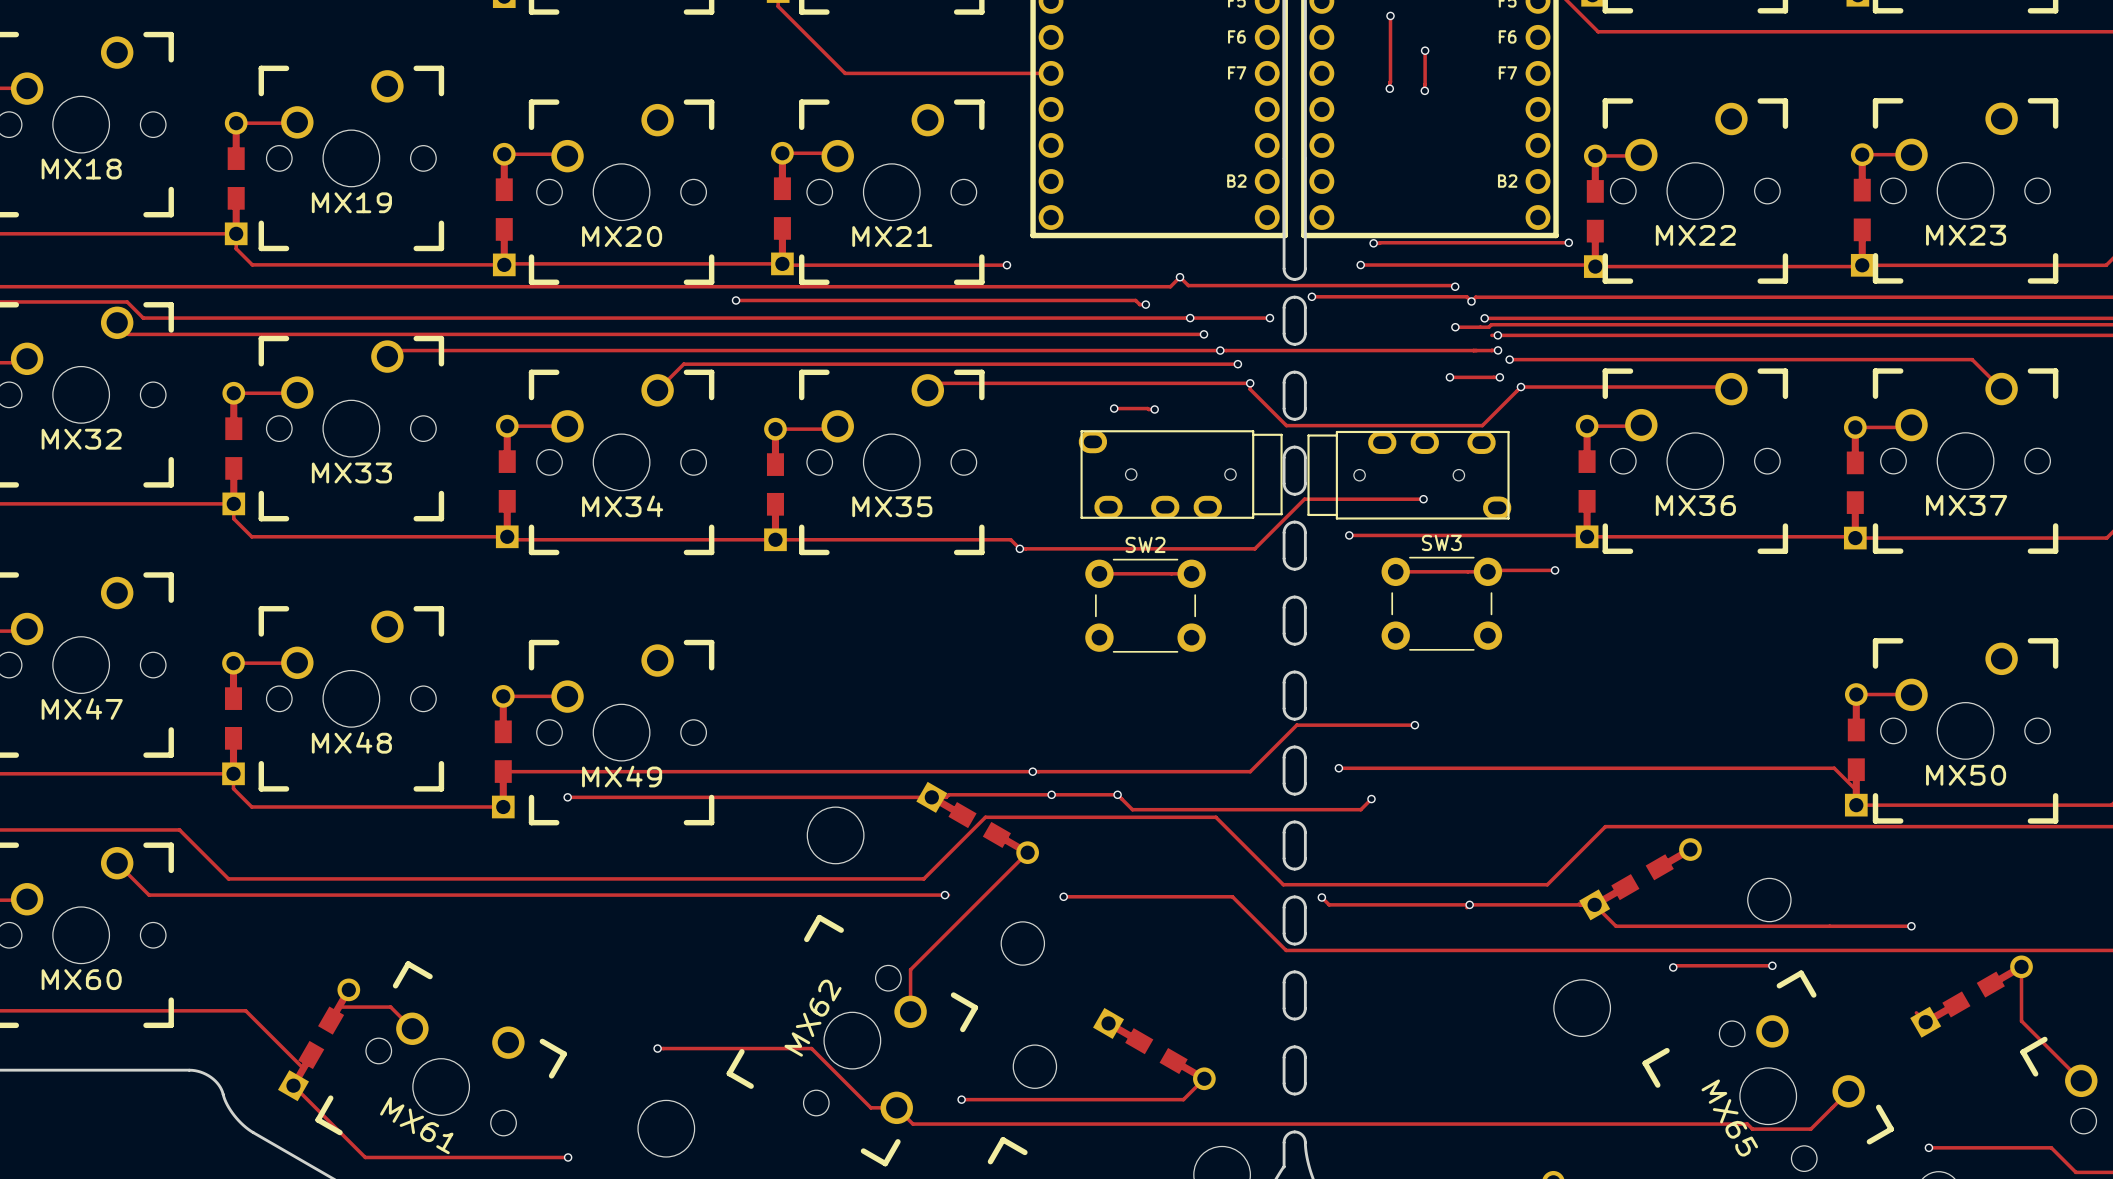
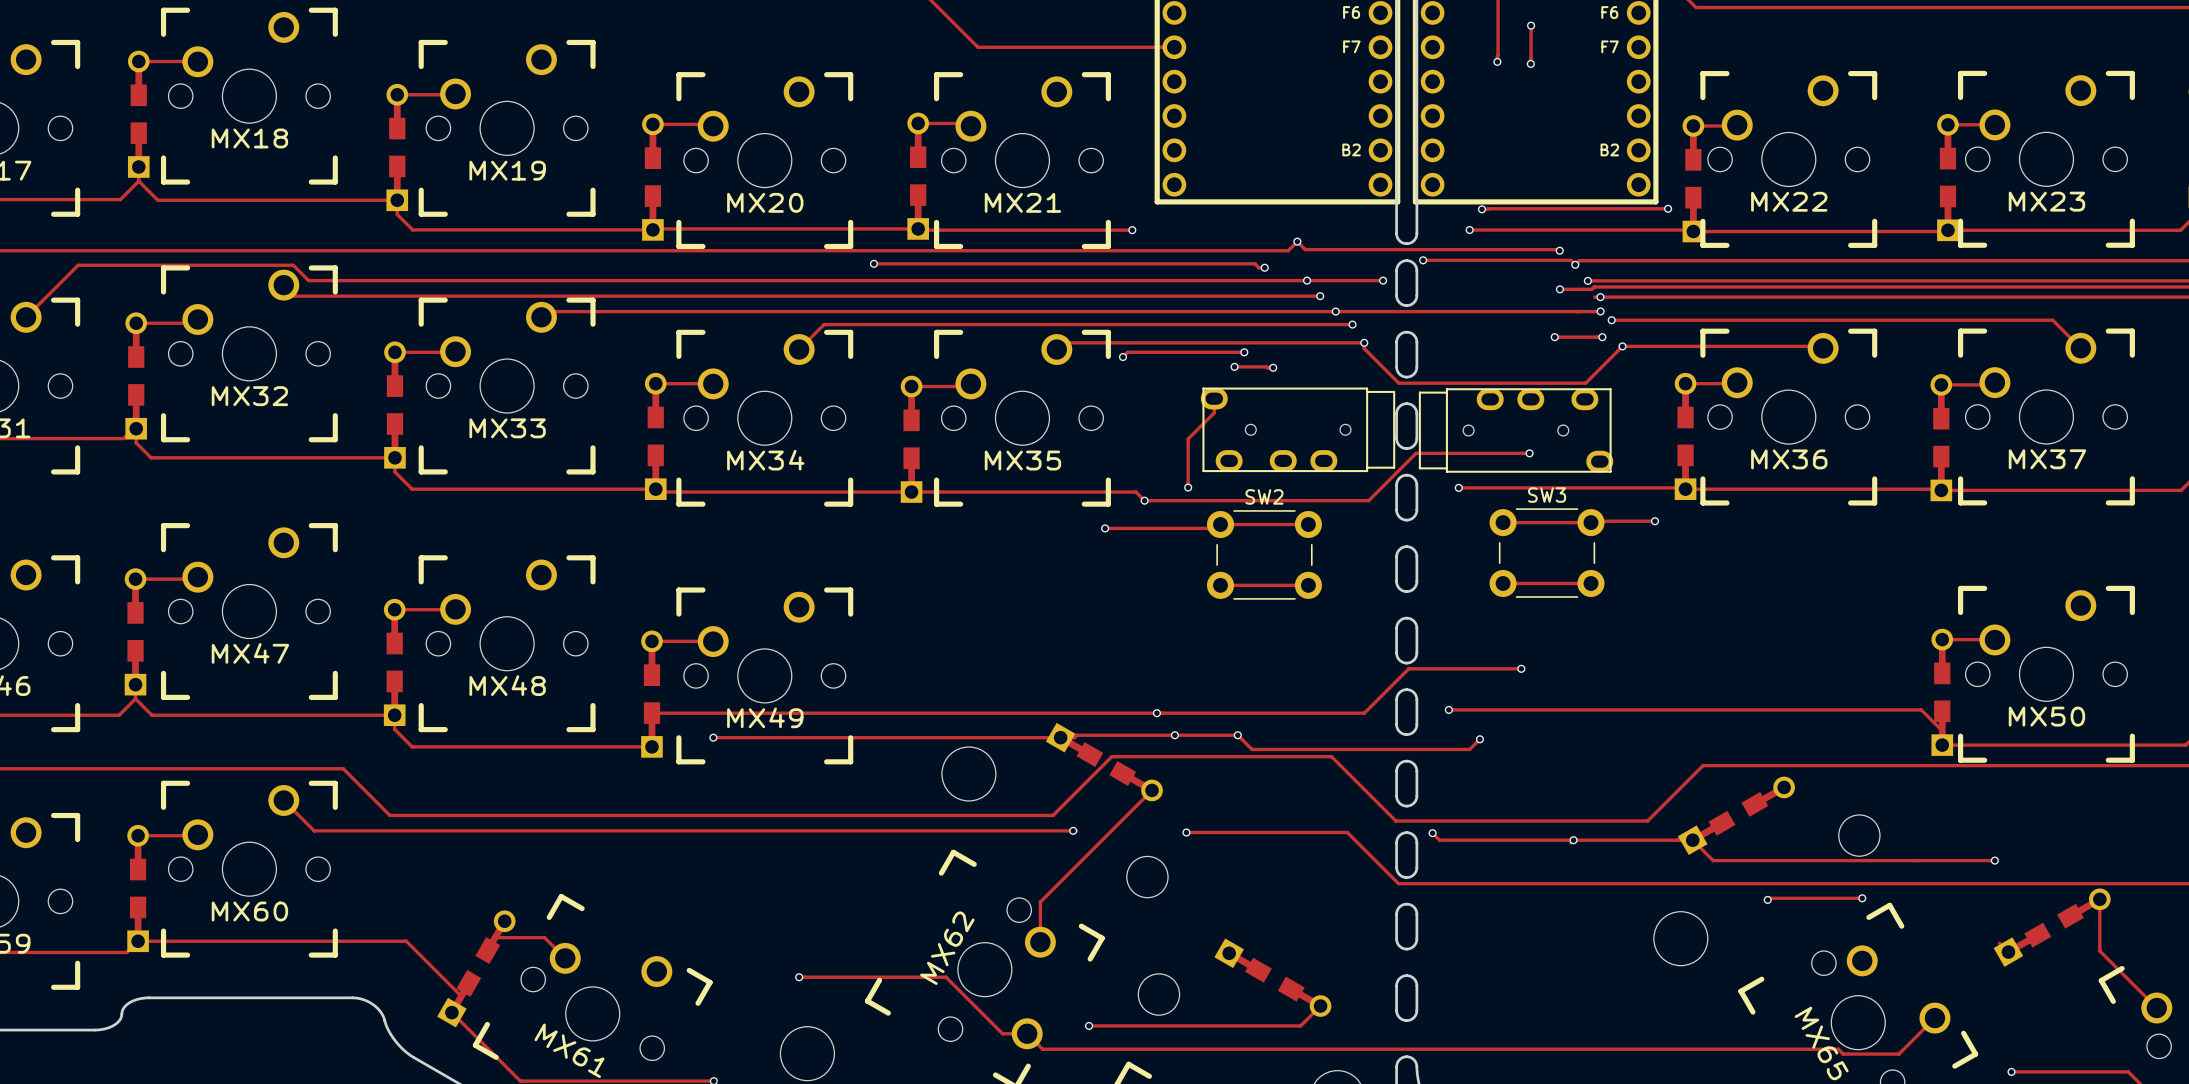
track: none -> (1244, 352) (1127, 352) (1122, 357)
via: none -> (1244, 352)
via: none -> (1122, 357)
track: none -> (1214, 398) (1214, 412) (1188, 439) (1188, 487)
via: none -> (1188, 487)
track: none -> (1220, 524) (1216, 528) (1105, 528)
via: none -> (1105, 528)
track: none -> (1503, 583) (1590, 583)
track: none -> (1220, 585) (1308, 585)

